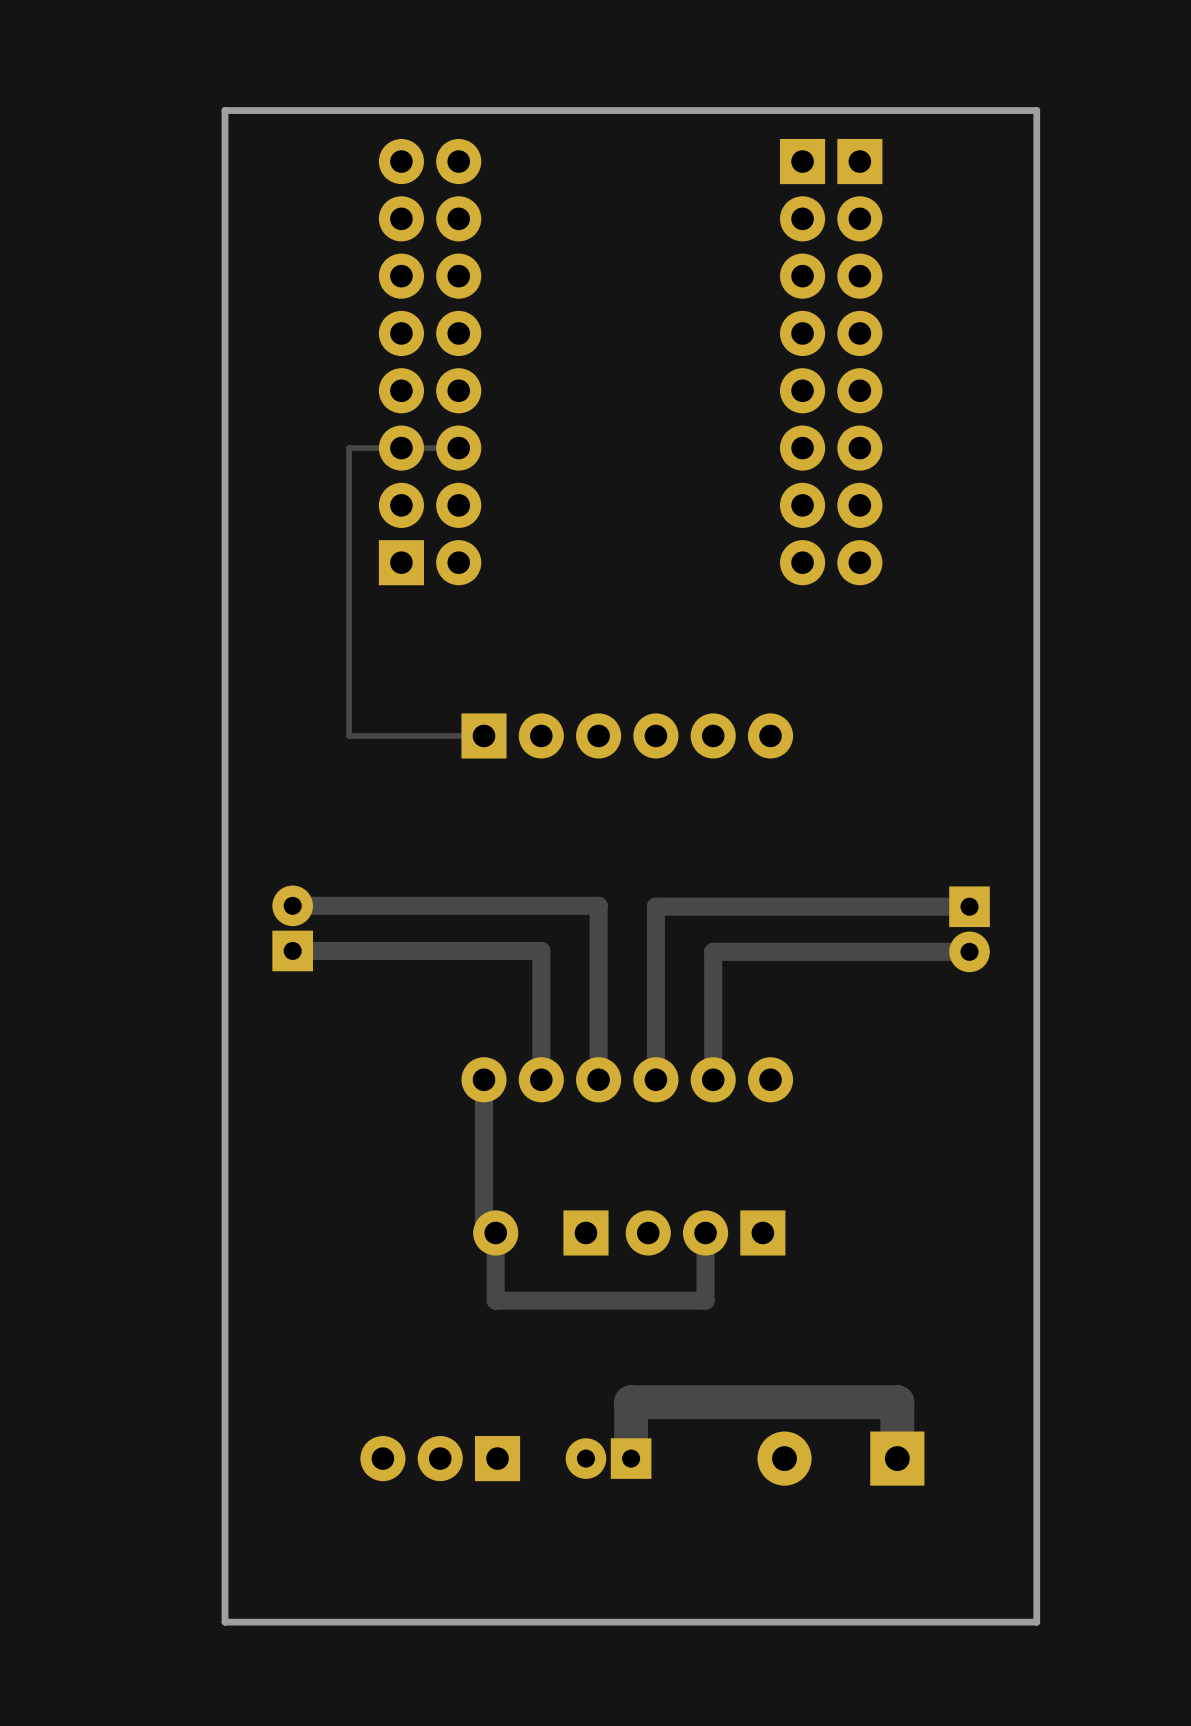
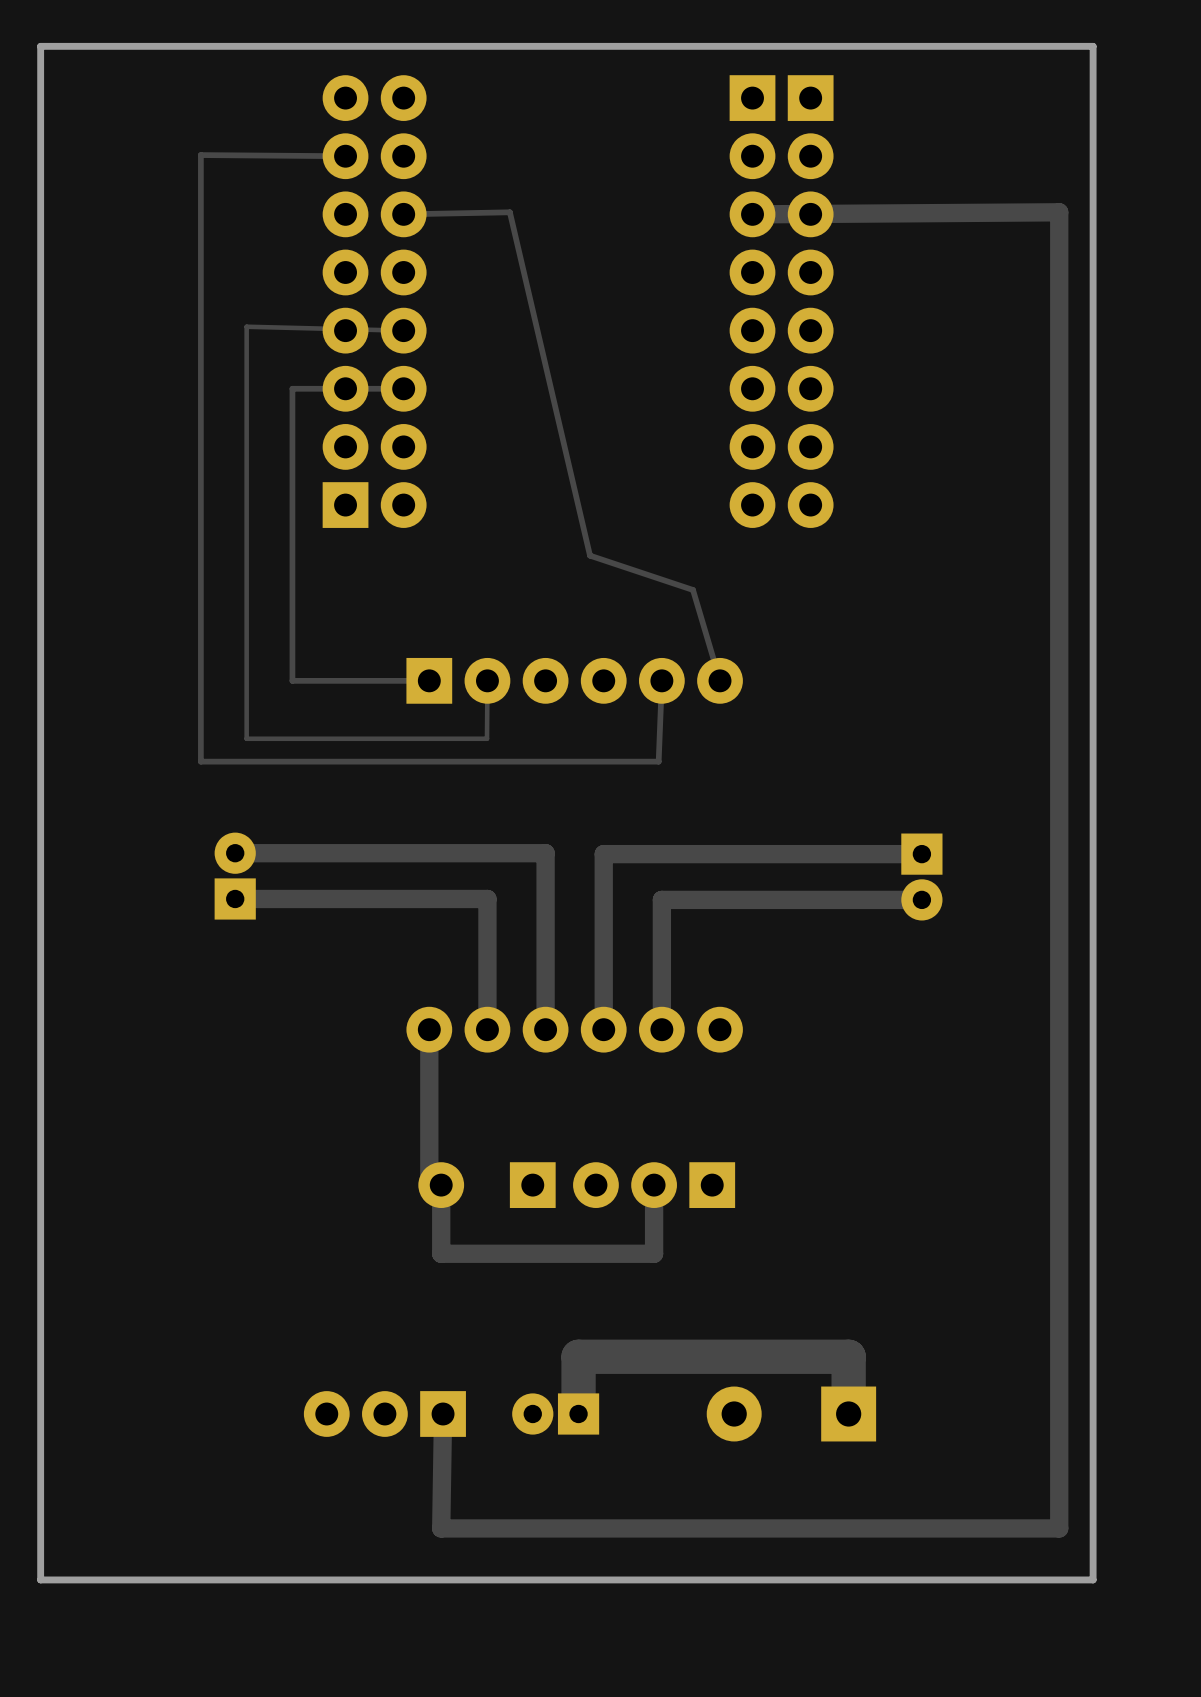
board edge: (225, 110) (225, 1622) -> (166, 46) (40, 46) (40, 1579) (166, 1579)
board edge: (1036, 110) (1036, 1622) -> (990, 46) (1093, 46) (1093, 1579) (990, 1579)
track: none -> (345, 156) (200, 155) (200, 761) (658, 761) (661, 680)
track: none -> (403, 214) (509, 212) (590, 555) (693, 589) (720, 680)
track: none -> (752, 214) (1059, 212) (1059, 1528) (441, 1528) (443, 1414)
track: none -> (403, 330) (246, 326) (246, 738) (487, 738) (487, 680)

